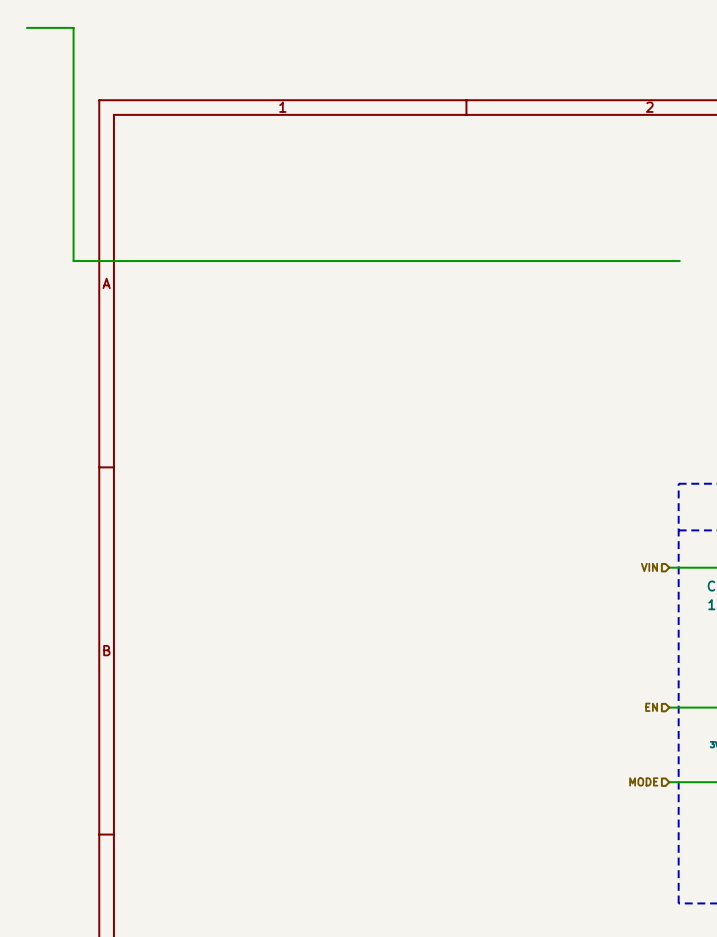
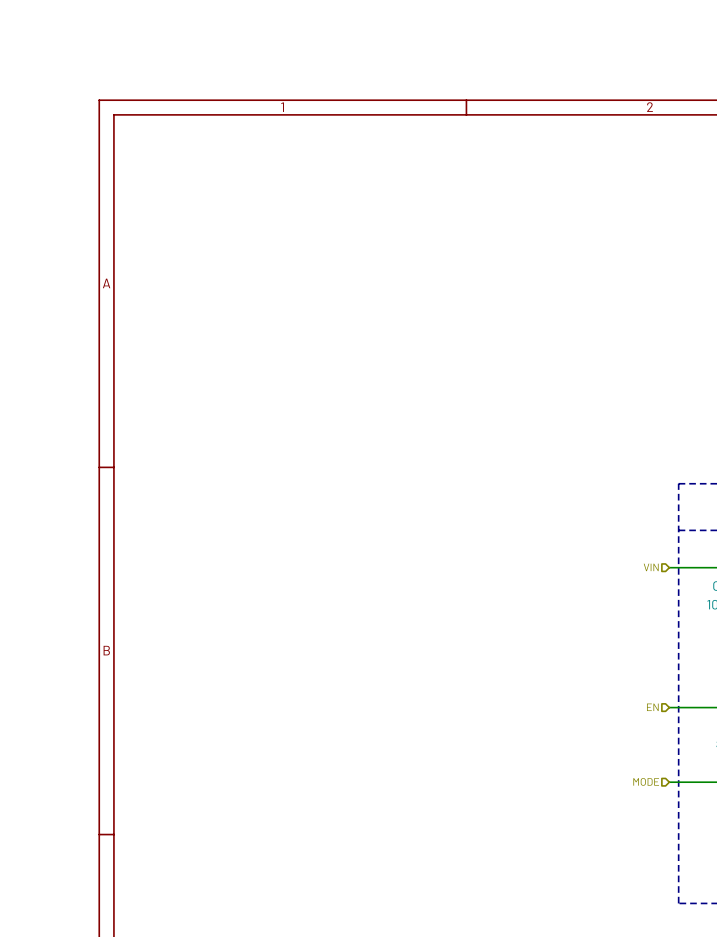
wire: (26, 27) (73, 27) (73, 261) (679, 261) -> none

